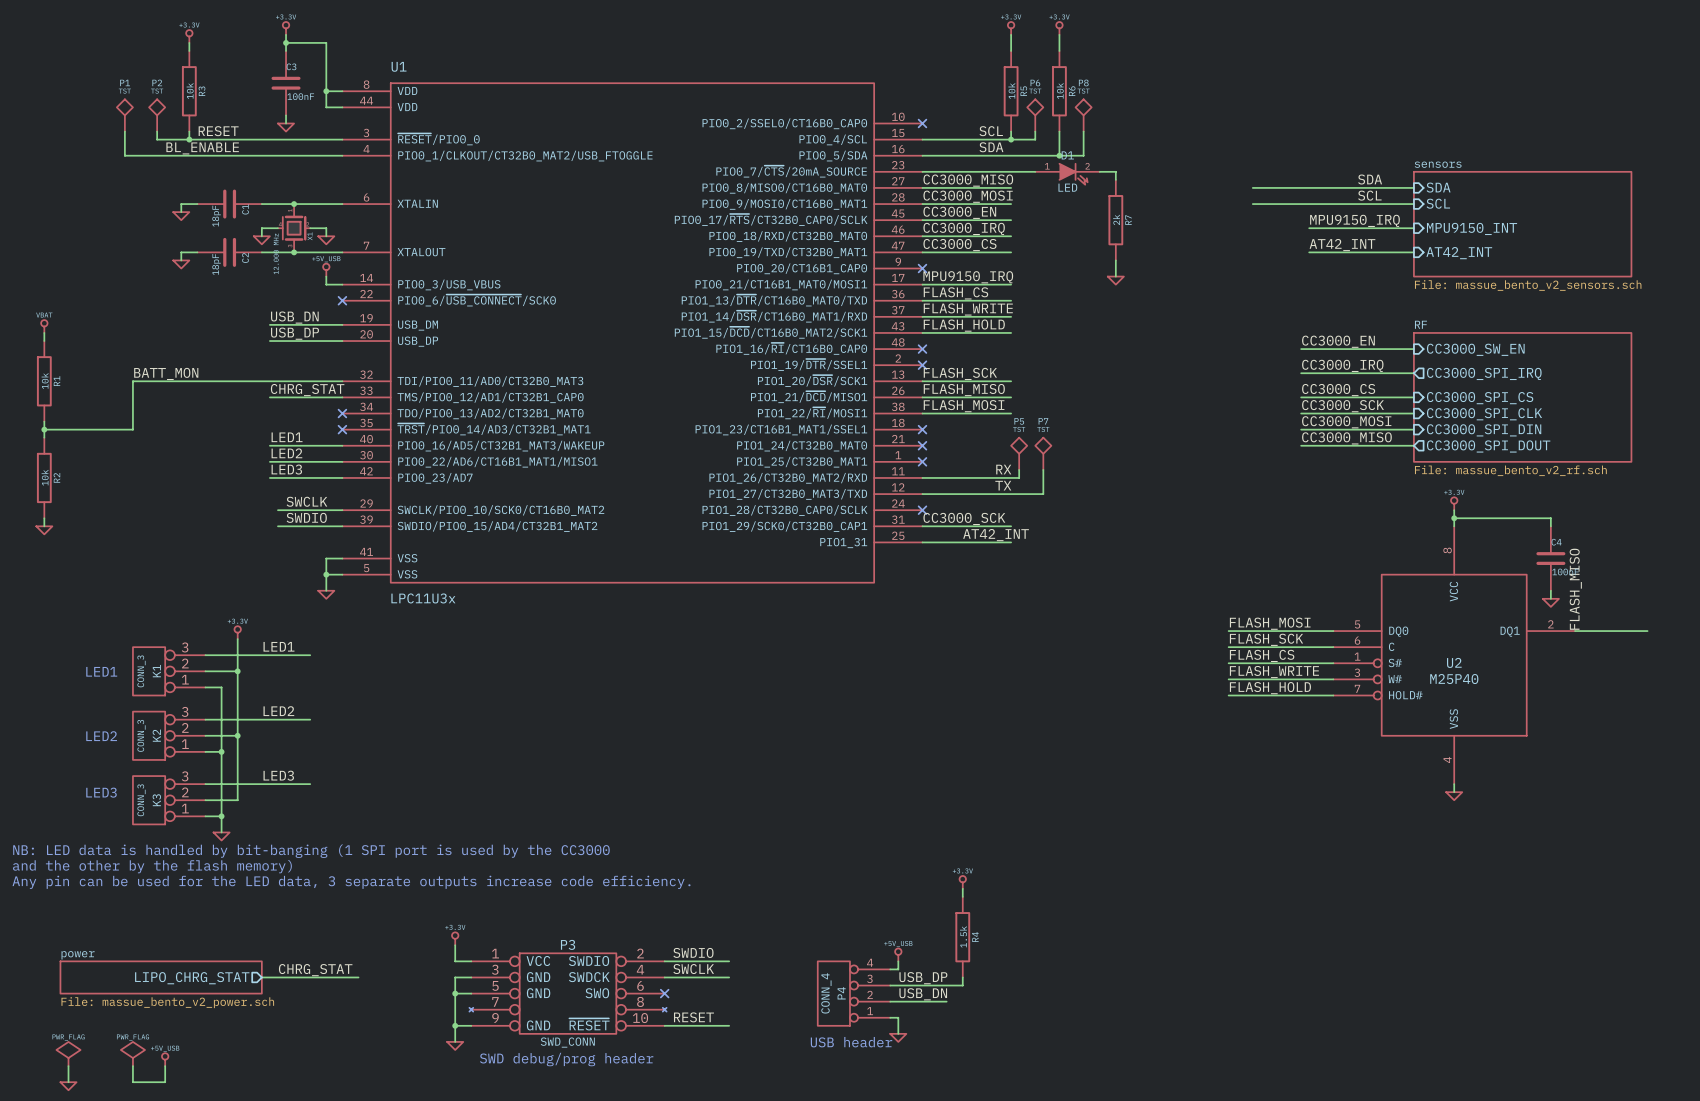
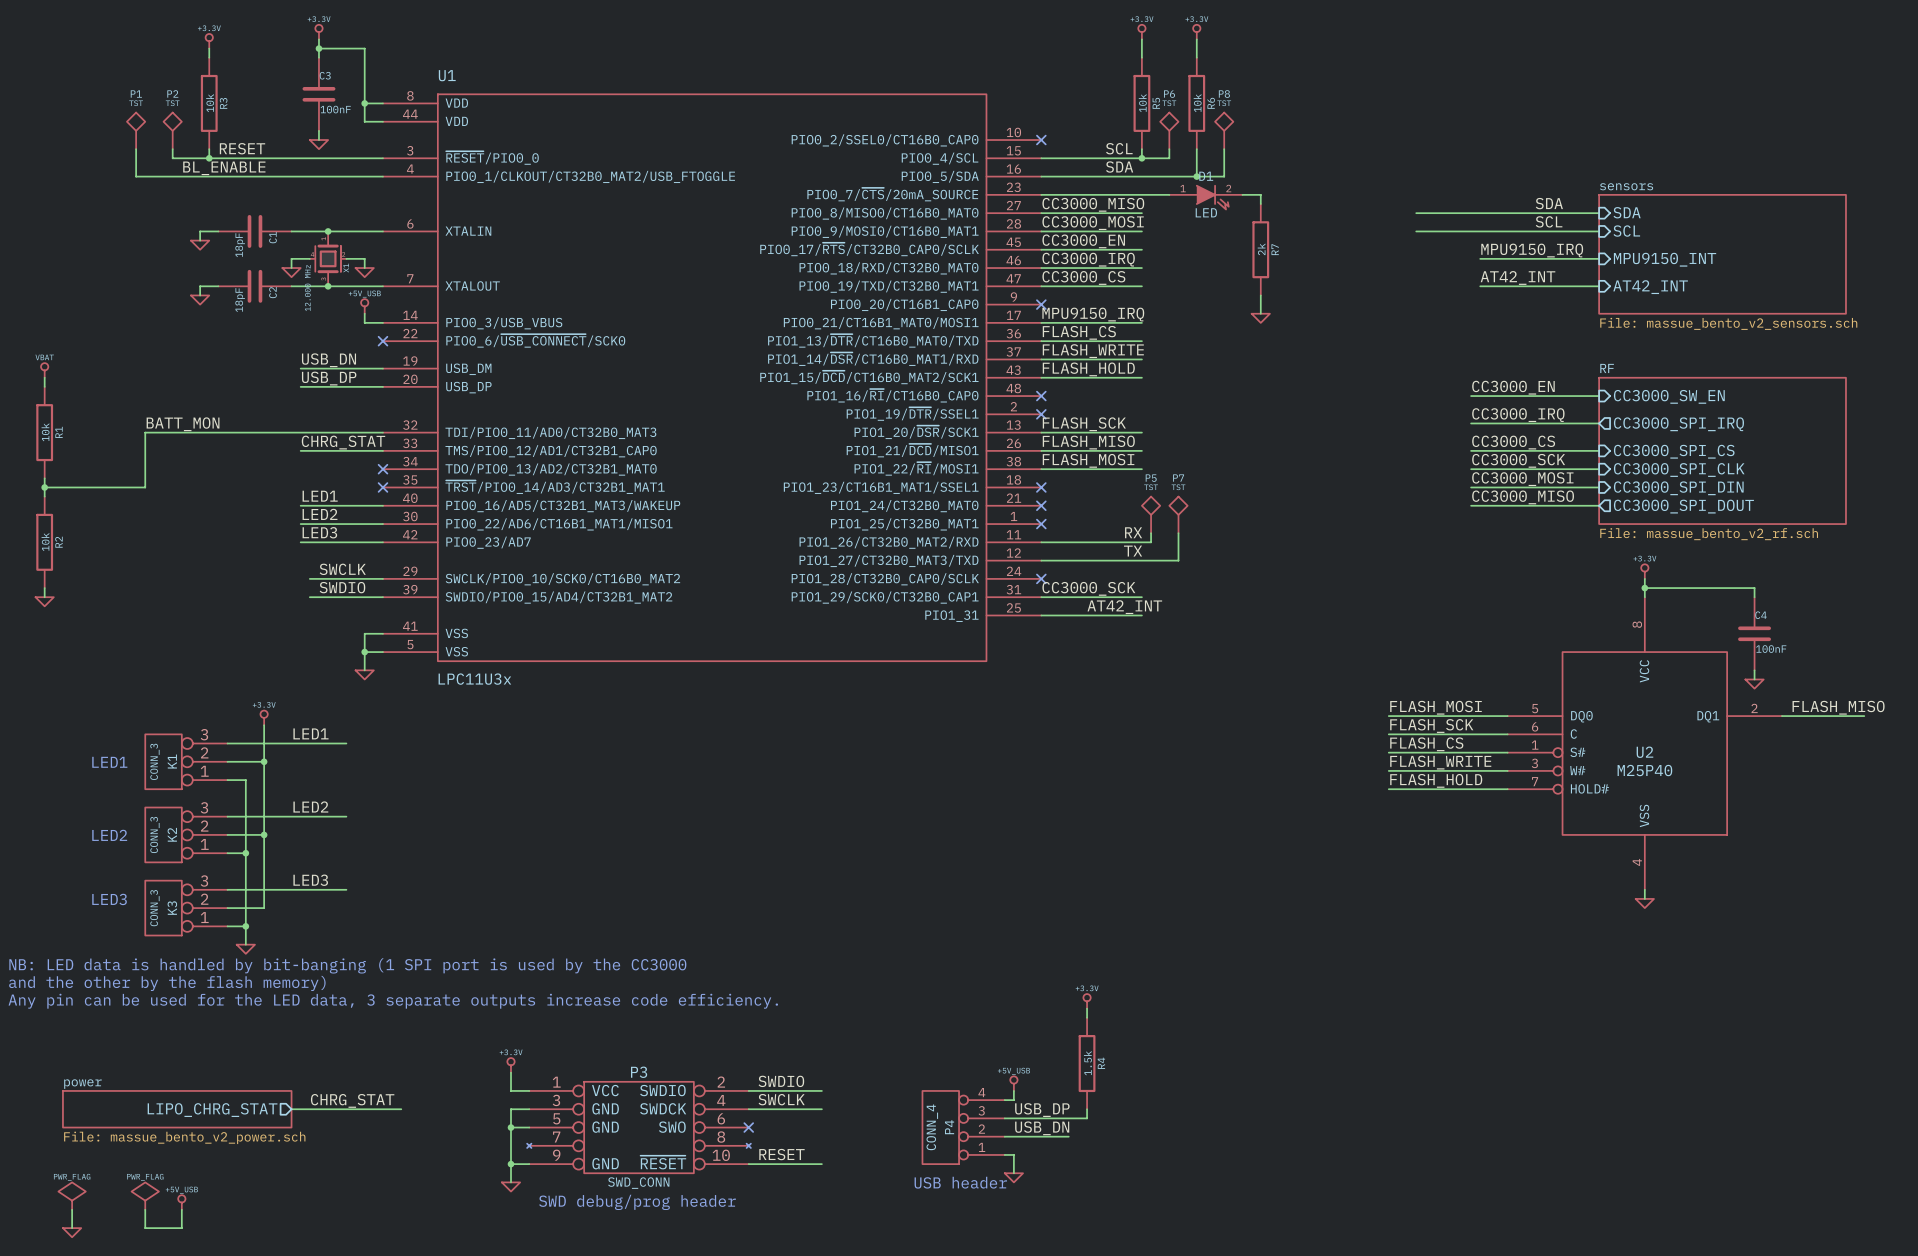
label rotation: 0° (1575, 589) -> 90° clockwise (1838, 707)

